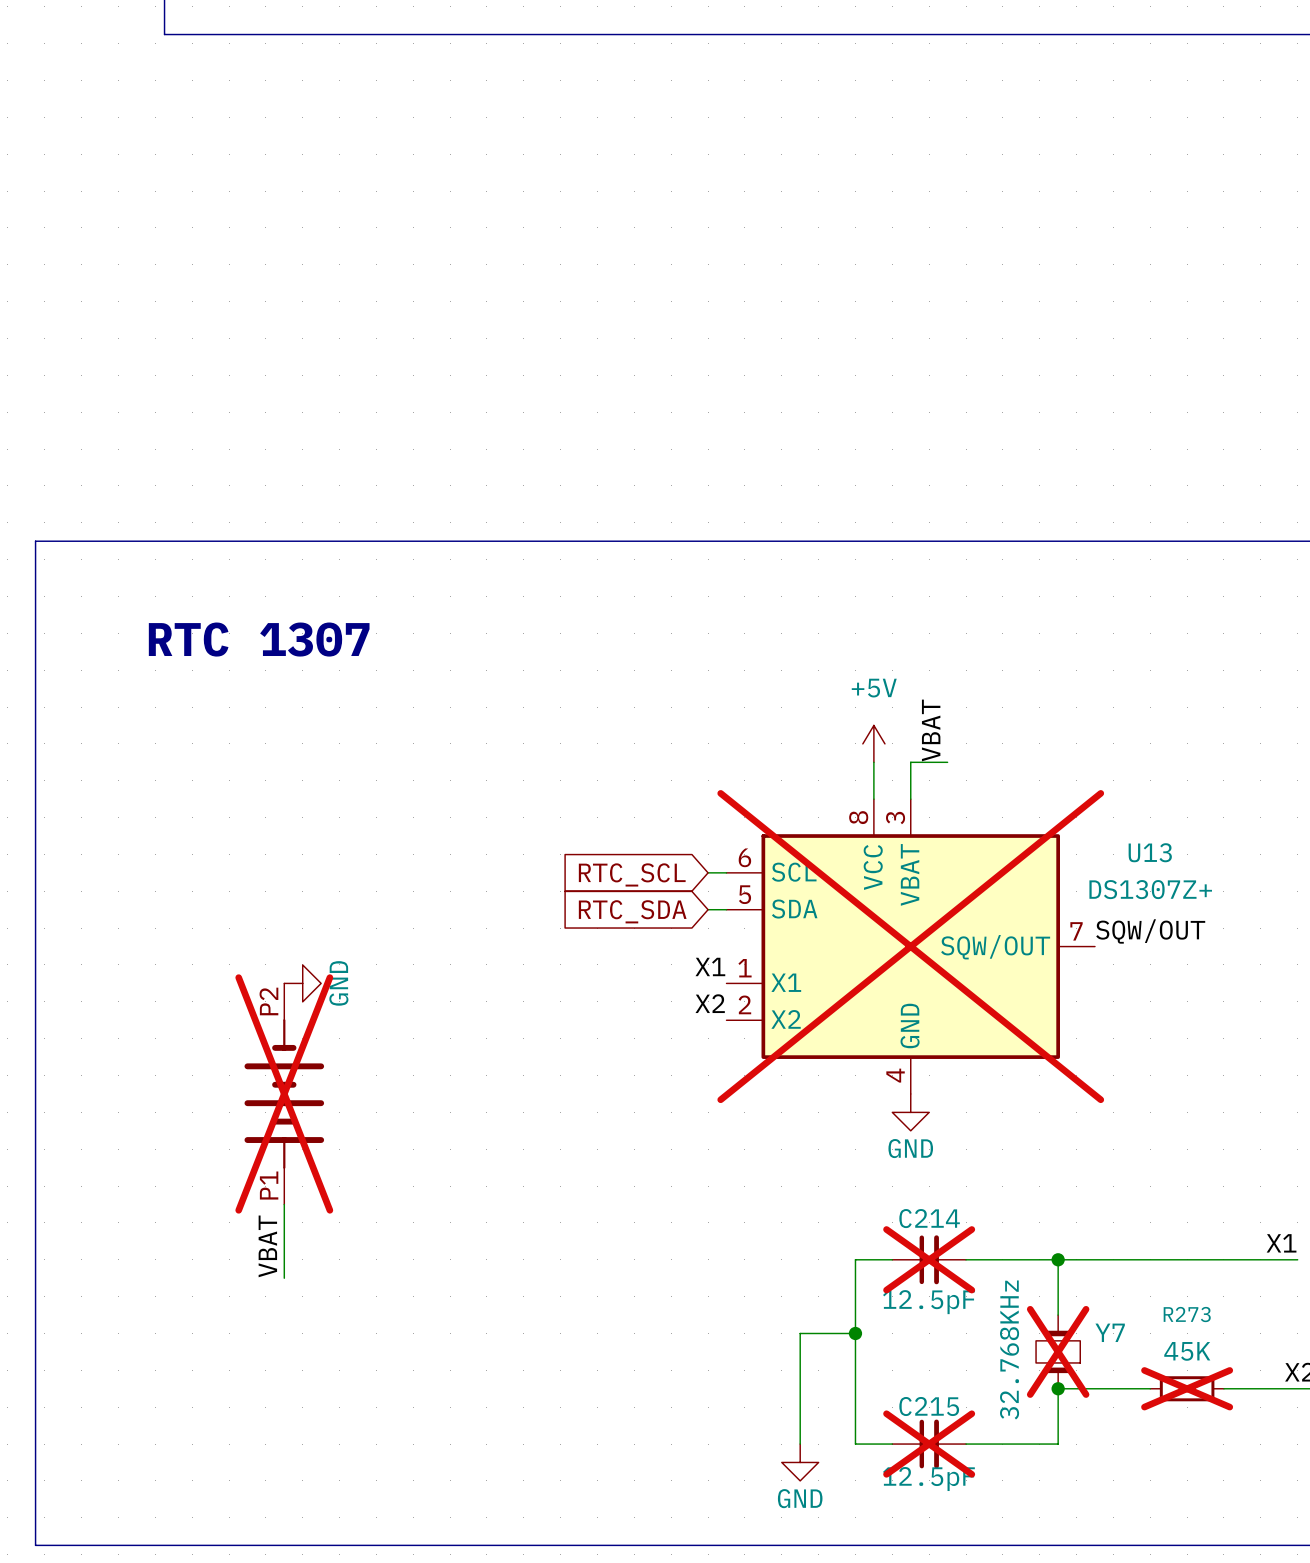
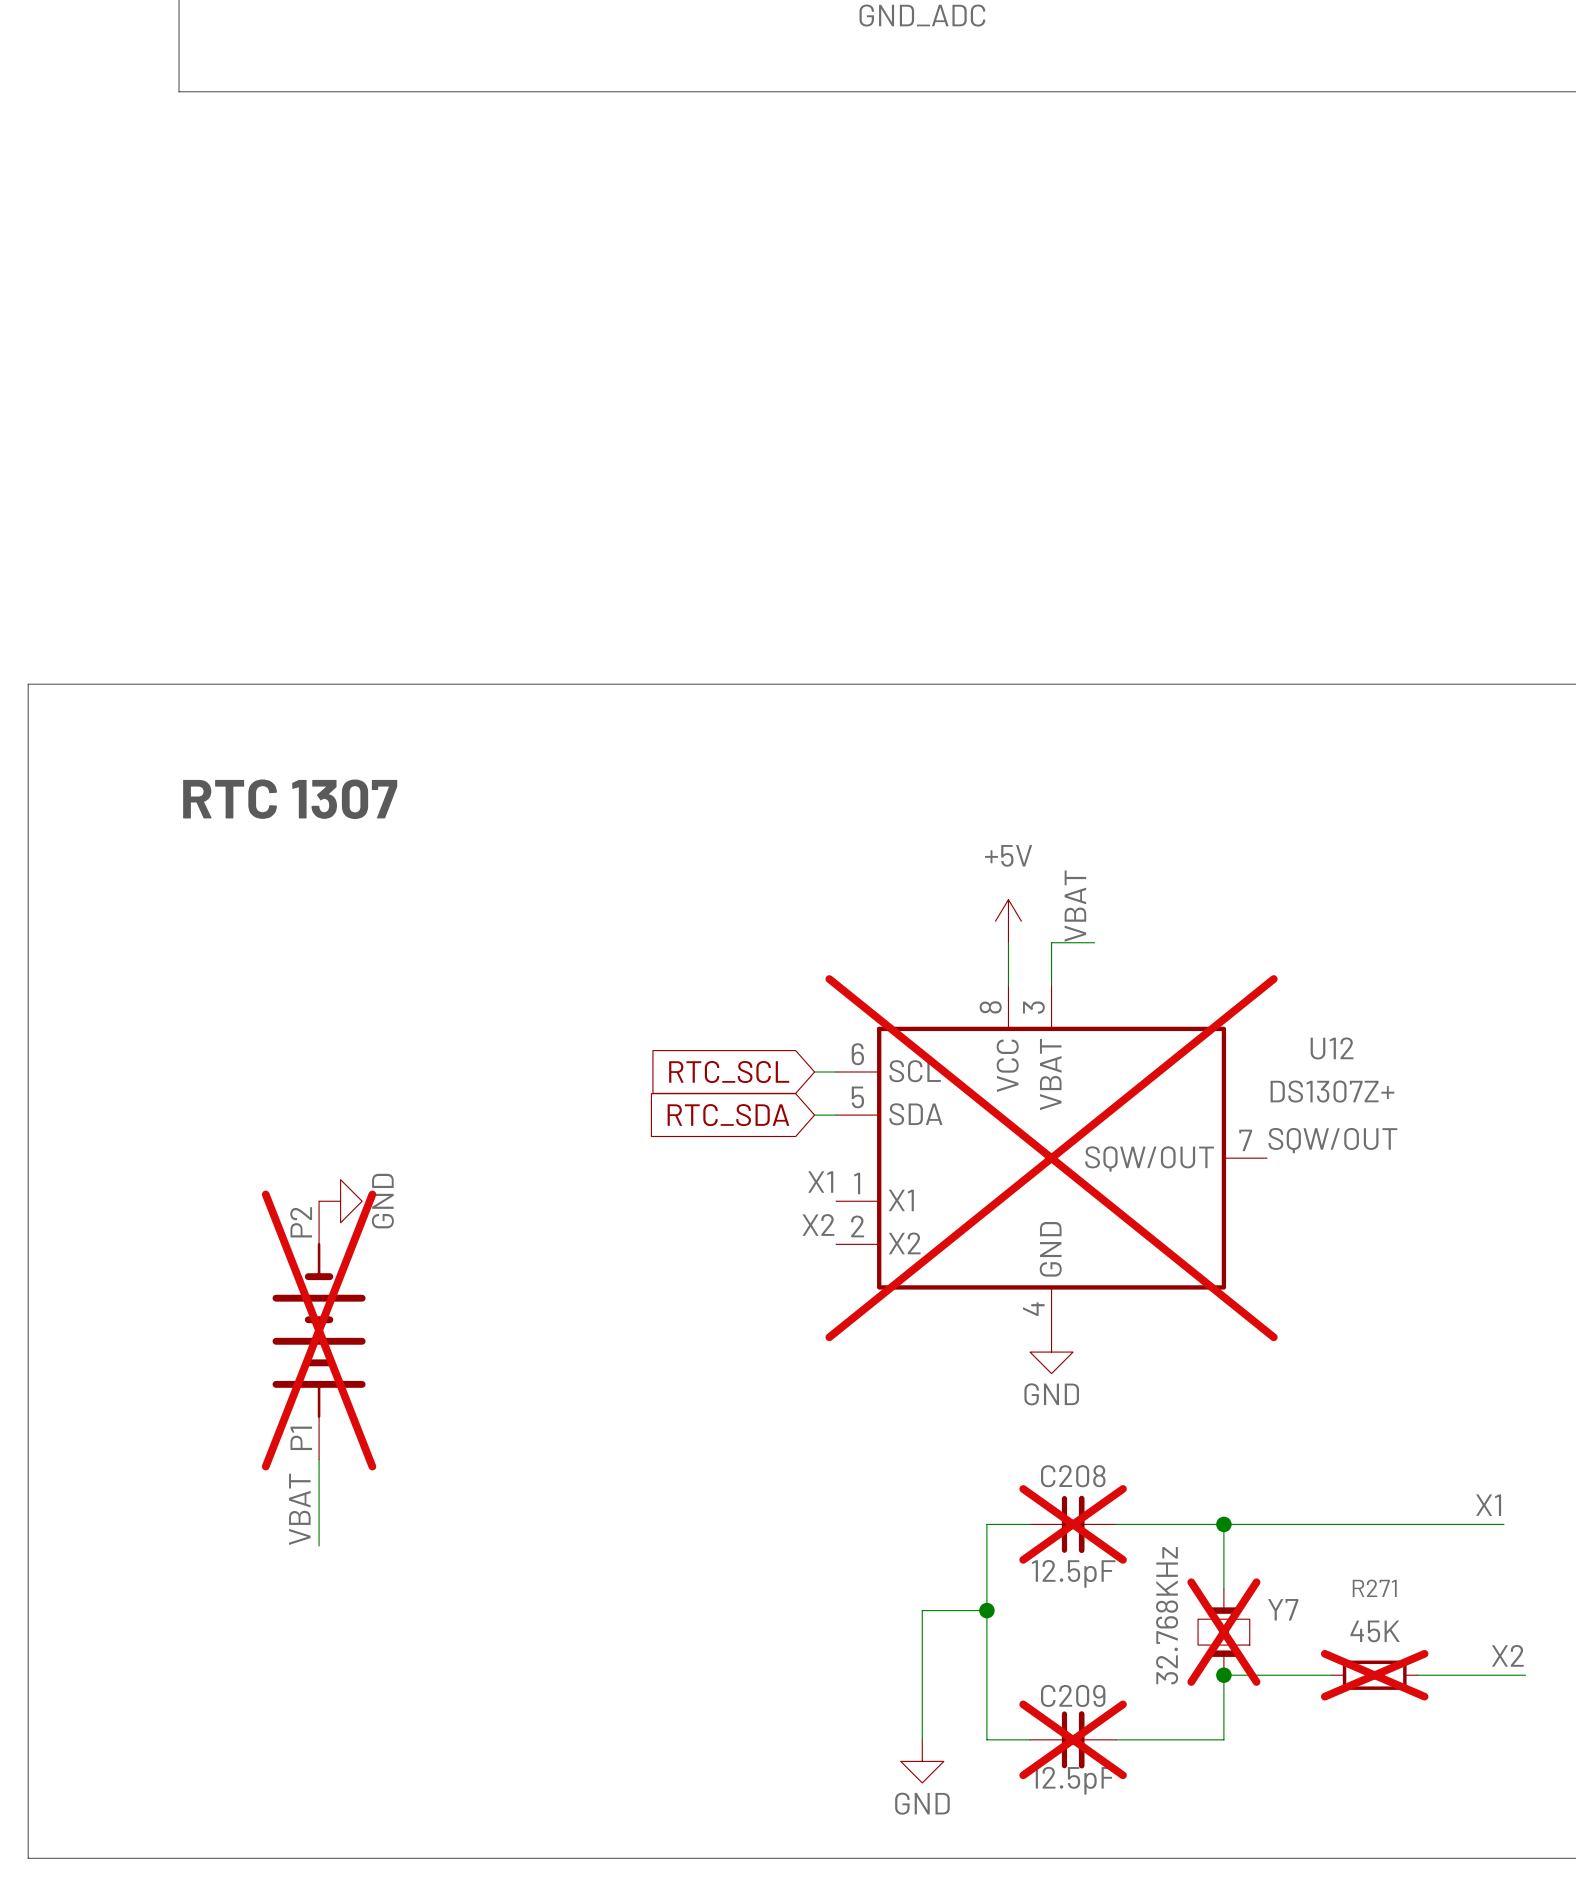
U13 name: U13 (1150, 852) -> U12 (1332, 1048)
C214 name: C214 (929, 1218) -> C208 (1073, 1476)
R273 name: R273 (1187, 1314) -> R271 (1374, 1588)
C215 name: C215 (929, 1406) -> C209 (1073, 1695)

